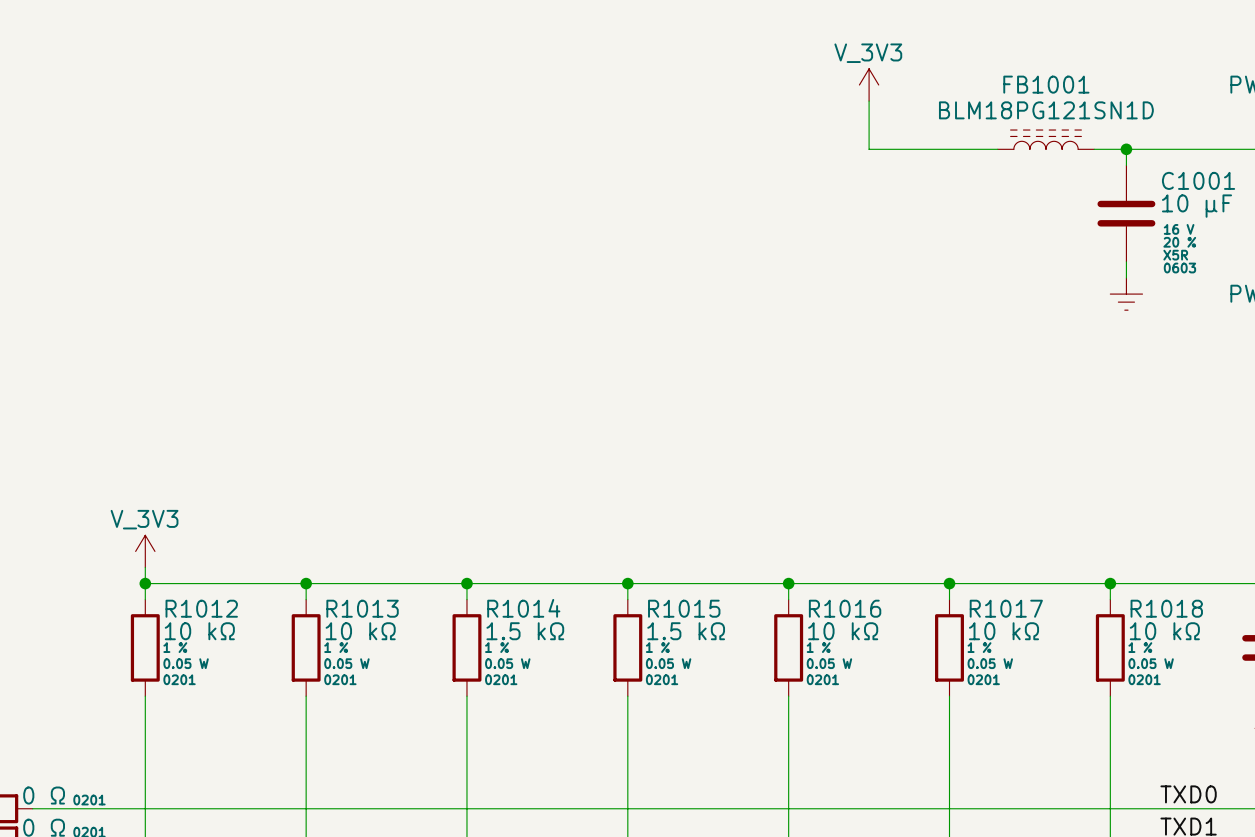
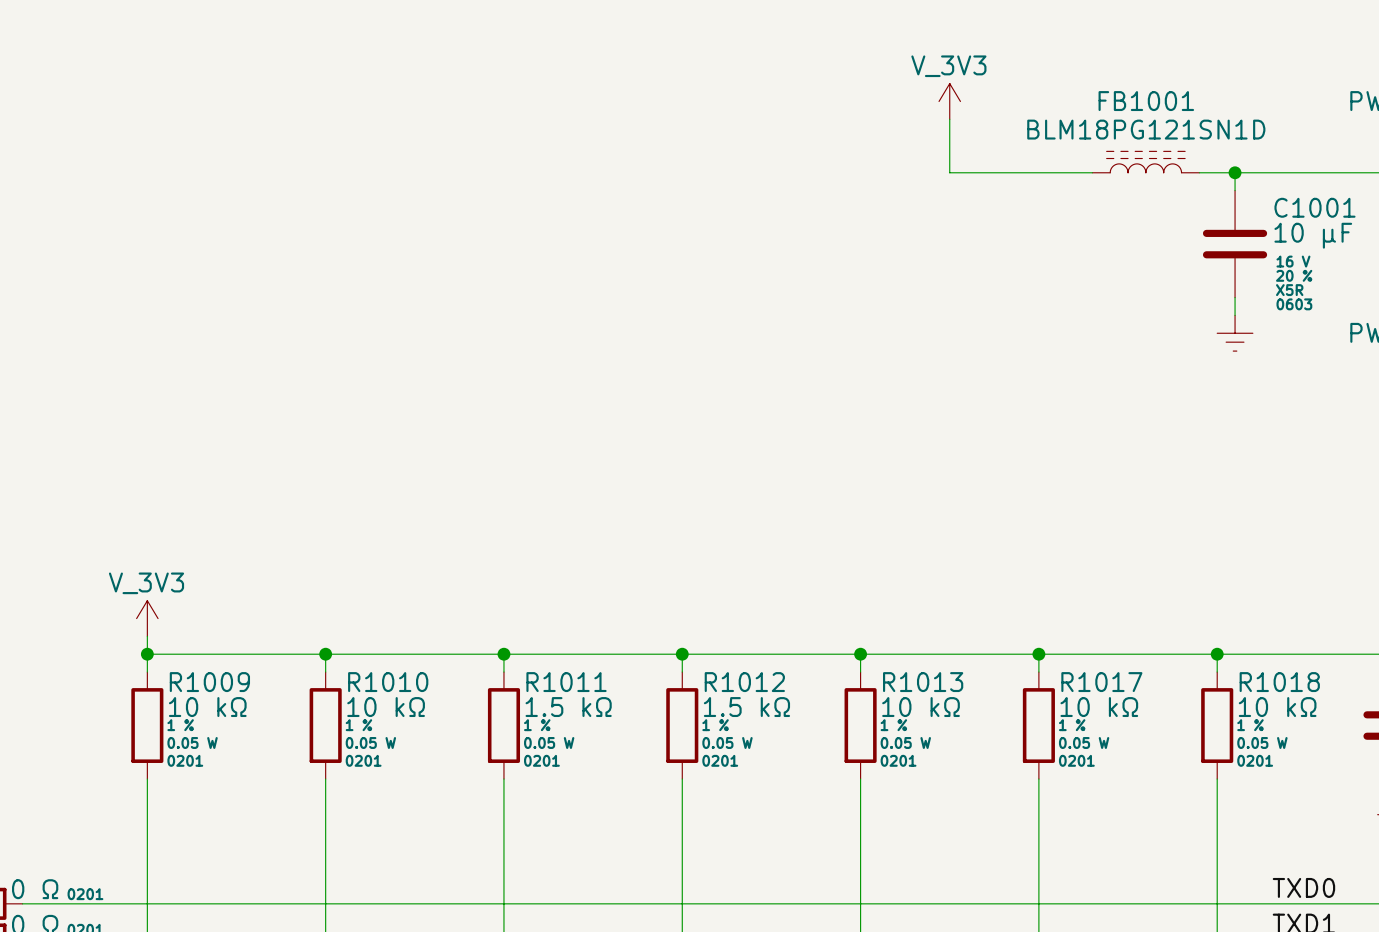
R1012 name: R1012 (201, 608) -> R1009 (209, 682)
R1013 name: R1013 (362, 608) -> R1010 (388, 682)
R1014 name: R1014 (523, 608) -> R1011 (566, 682)
R1015 name: R1015 (684, 608) -> R1012 (744, 682)
R1016 name: R1016 (845, 608) -> R1013 (923, 682)

